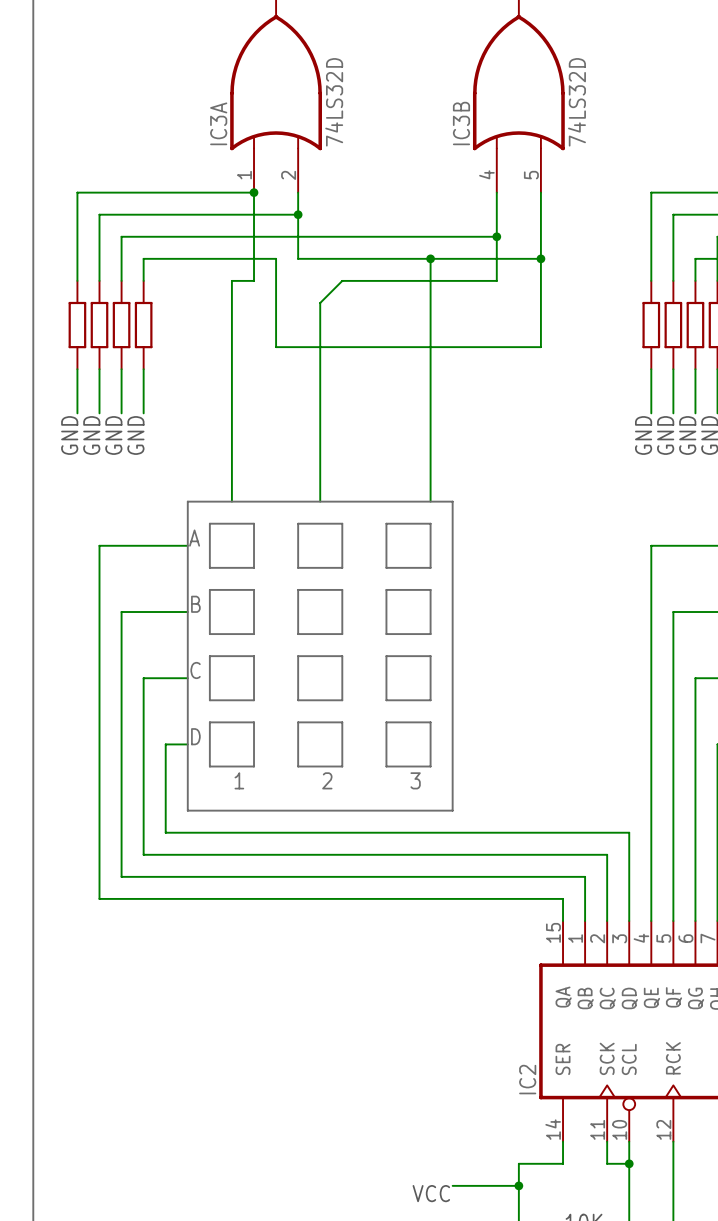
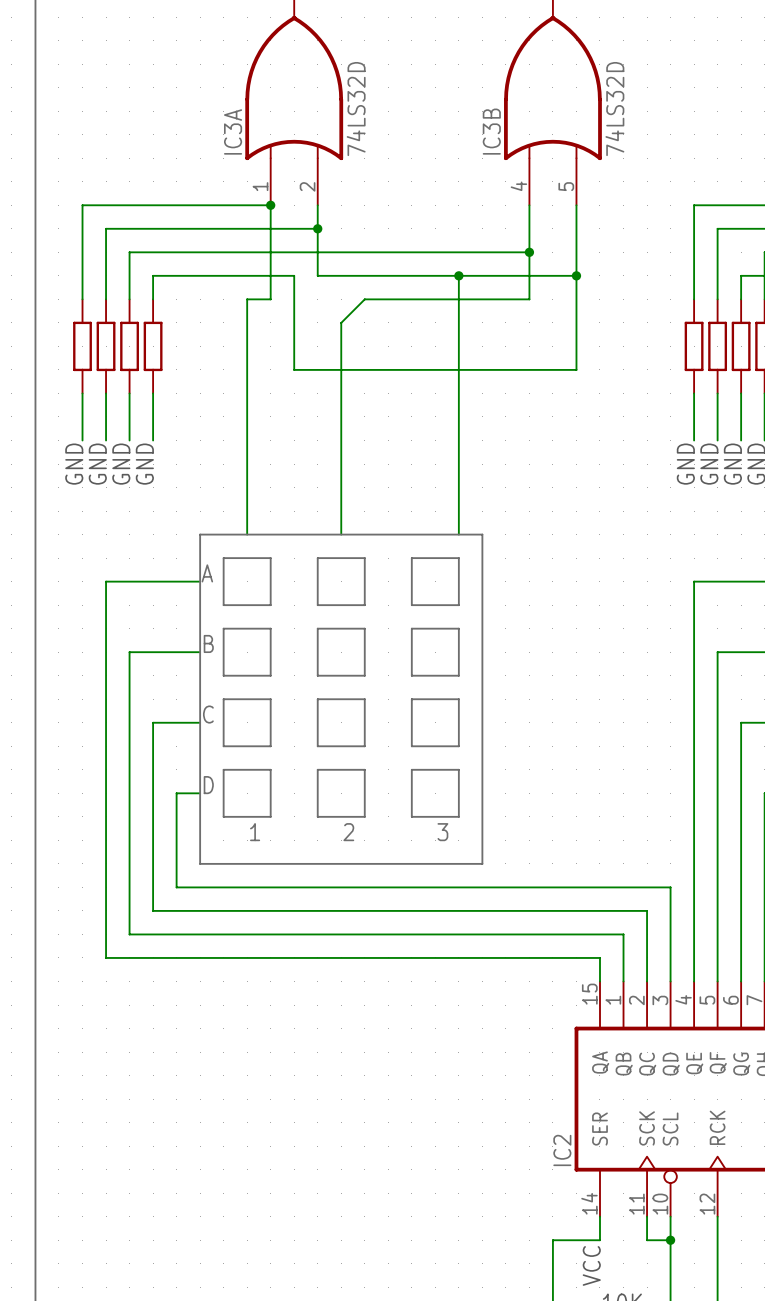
wire: (452, 1185) (518, 1185) -> none
junction: (518, 1185) -> none
text rotation: 0° (431, 1193) -> 90° counterclockwise (591, 1265)
text position: VCC (431, 1193) -> VCC (591, 1265)

